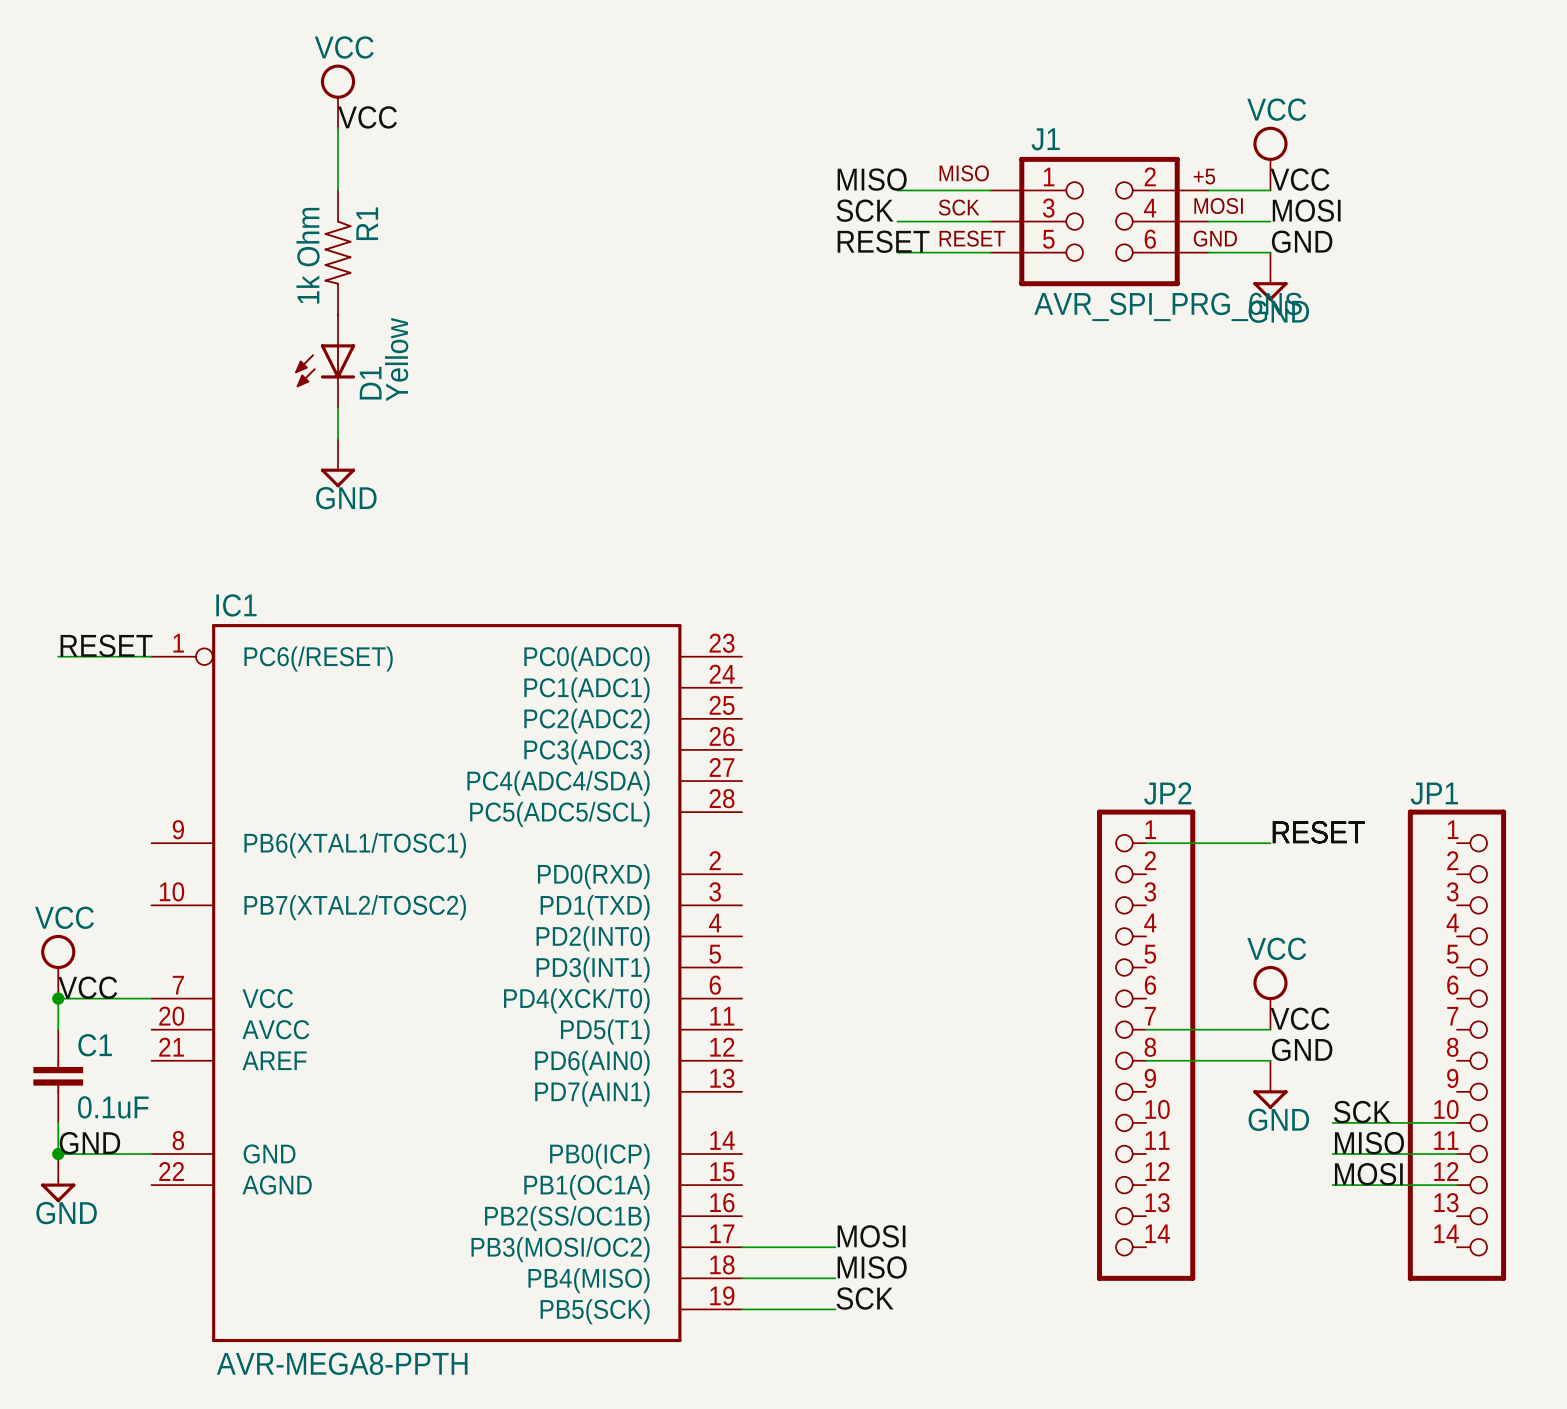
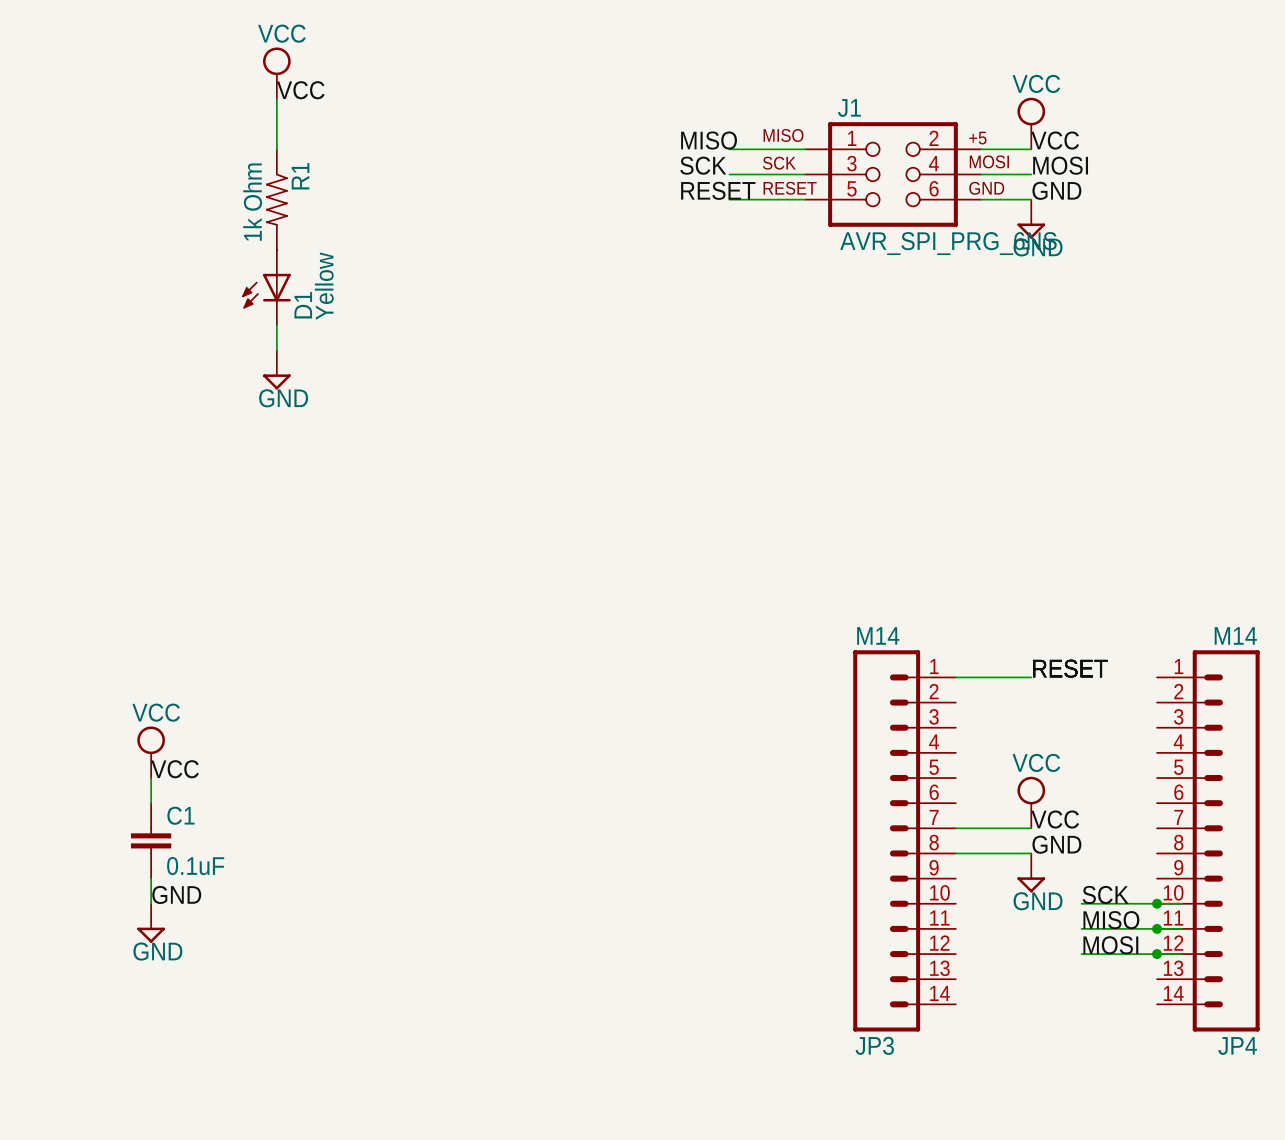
label: RESET (106, 645) -> none
wire: (58, 656) (151, 656) -> none
power symbol position: VCC (58, 966) -> VCC (151, 752)
wire: none -> (151, 778) (151, 803)
IC1: AVR-MEGA8-PPTH (446, 983) -> none
label position: VCC (87, 987) -> VCC (175, 769)
junction: (58, 998) -> none
wire: (151, 998) (58, 998) (58, 1029) -> none
JP3: none -> M14 (904, 840)
JP2: (1146, 1045) -> none
JP1: (1456, 1045) -> none
JP4: none -> M14 (1208, 840)
C1 position: (58, 1076) -> (151, 840)
wire: none -> (151, 878) (151, 903)
wire: (58, 1122) (58, 1154) (151, 1154) -> none
junction: none -> (1157, 903)
label position: GND (89, 1143) -> GND (176, 894)
junction: (58, 1154) -> none
junction: none -> (1157, 928)
power symbol position: GND (58, 1178) -> GND (151, 923)
junction: none -> (1157, 954)
label: MOSI (871, 1236) -> none
wire: (742, 1247) (835, 1247) -> none
label: MISO (872, 1267) -> none
wire: (742, 1278) (835, 1278) -> none
label: SCK (865, 1298) -> none
wire: (742, 1309) (835, 1309) -> none

